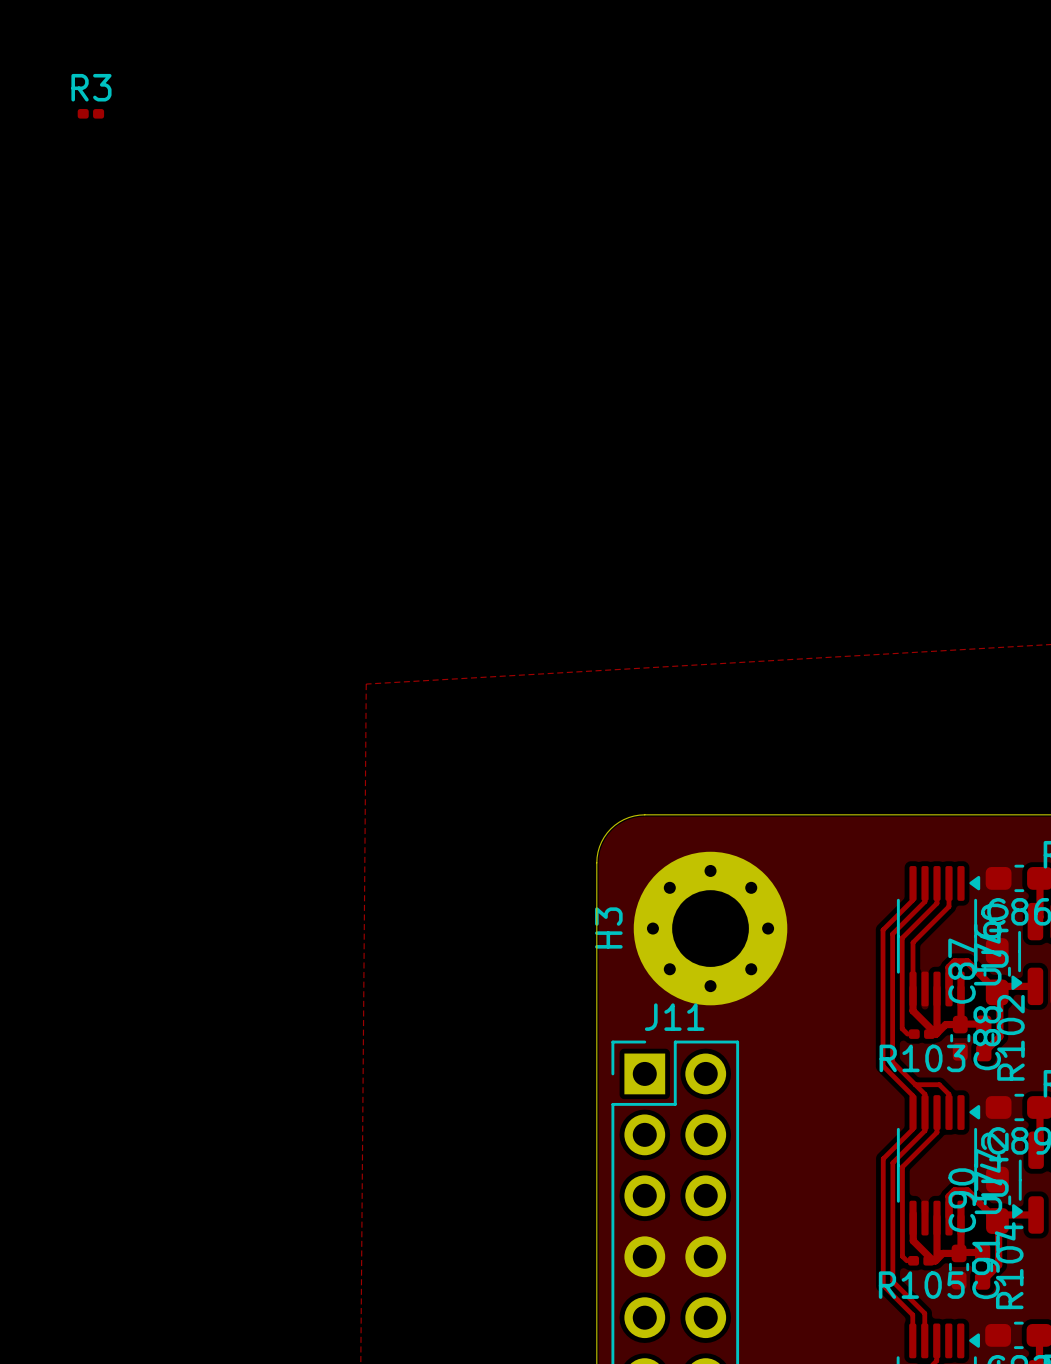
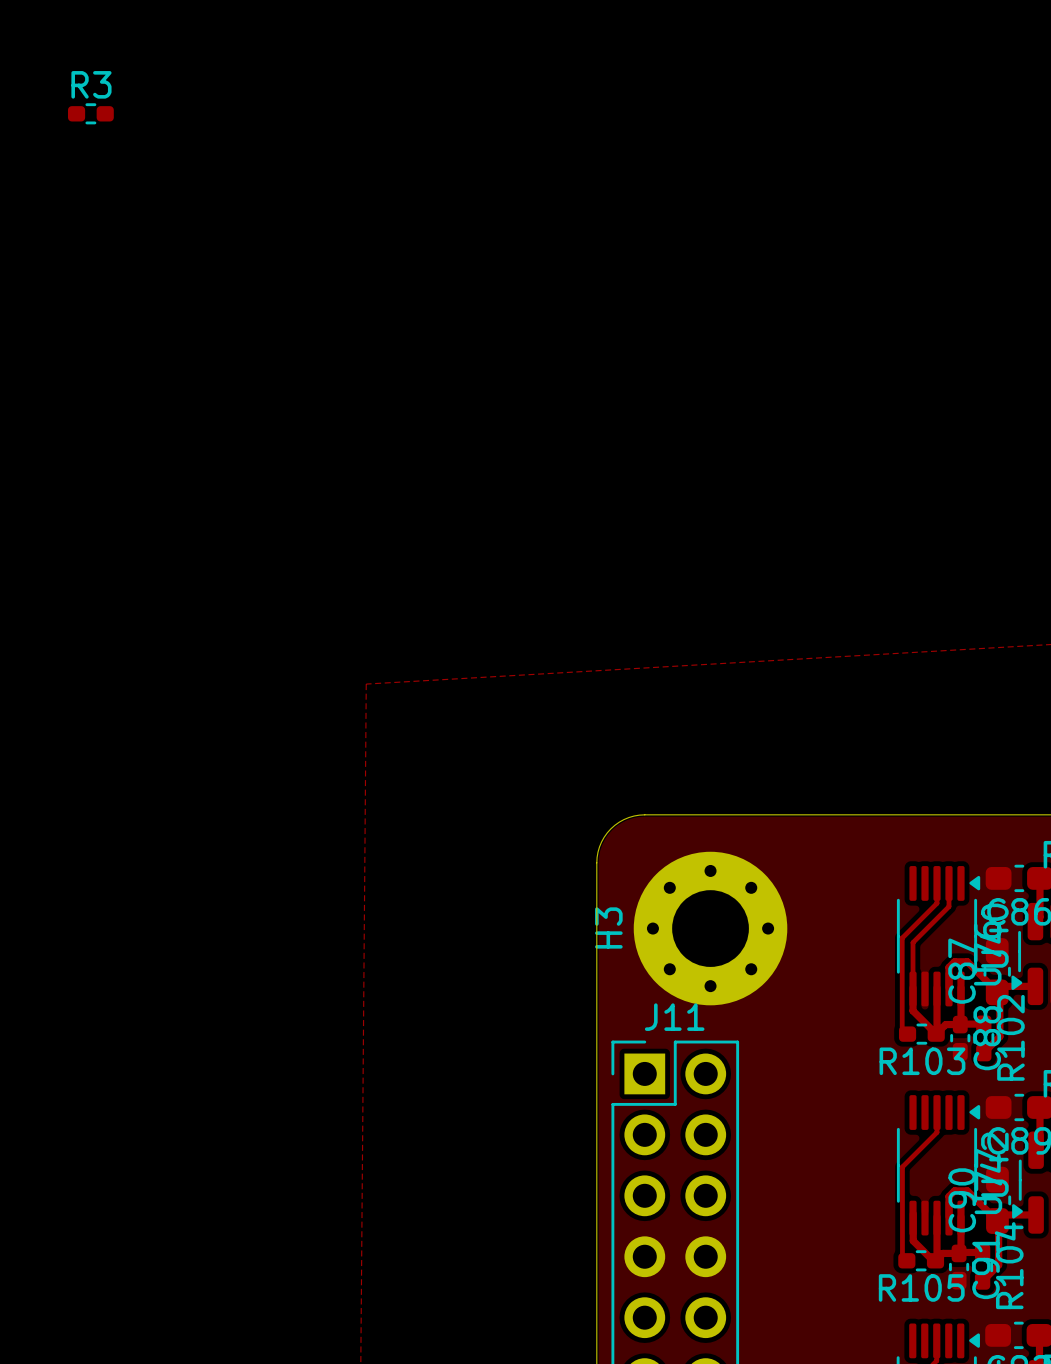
R3 footprint: [77, 109, 105, 119] -> [67, 103, 114, 125]
track: (913, 883) (913, 900) (883, 930) (883, 1065) (913, 1095) (913, 1129) (883, 1158) (883, 1285) (912, 1314) (912, 1340) -> none
track: (925, 883) (925, 901) (892, 934) (892, 1061) (925, 1094) (925, 1130) (892, 1162) (892, 1281) (924, 1313) (924, 1340) -> none
R103 footprint: [908, 1029, 936, 1039] -> [898, 1023, 945, 1045]
track: (915, 1084) (939, 1084) (949, 1094) (949, 1112) -> none
R105 footprint: [907, 1256, 935, 1266] -> [898, 1250, 945, 1272]

